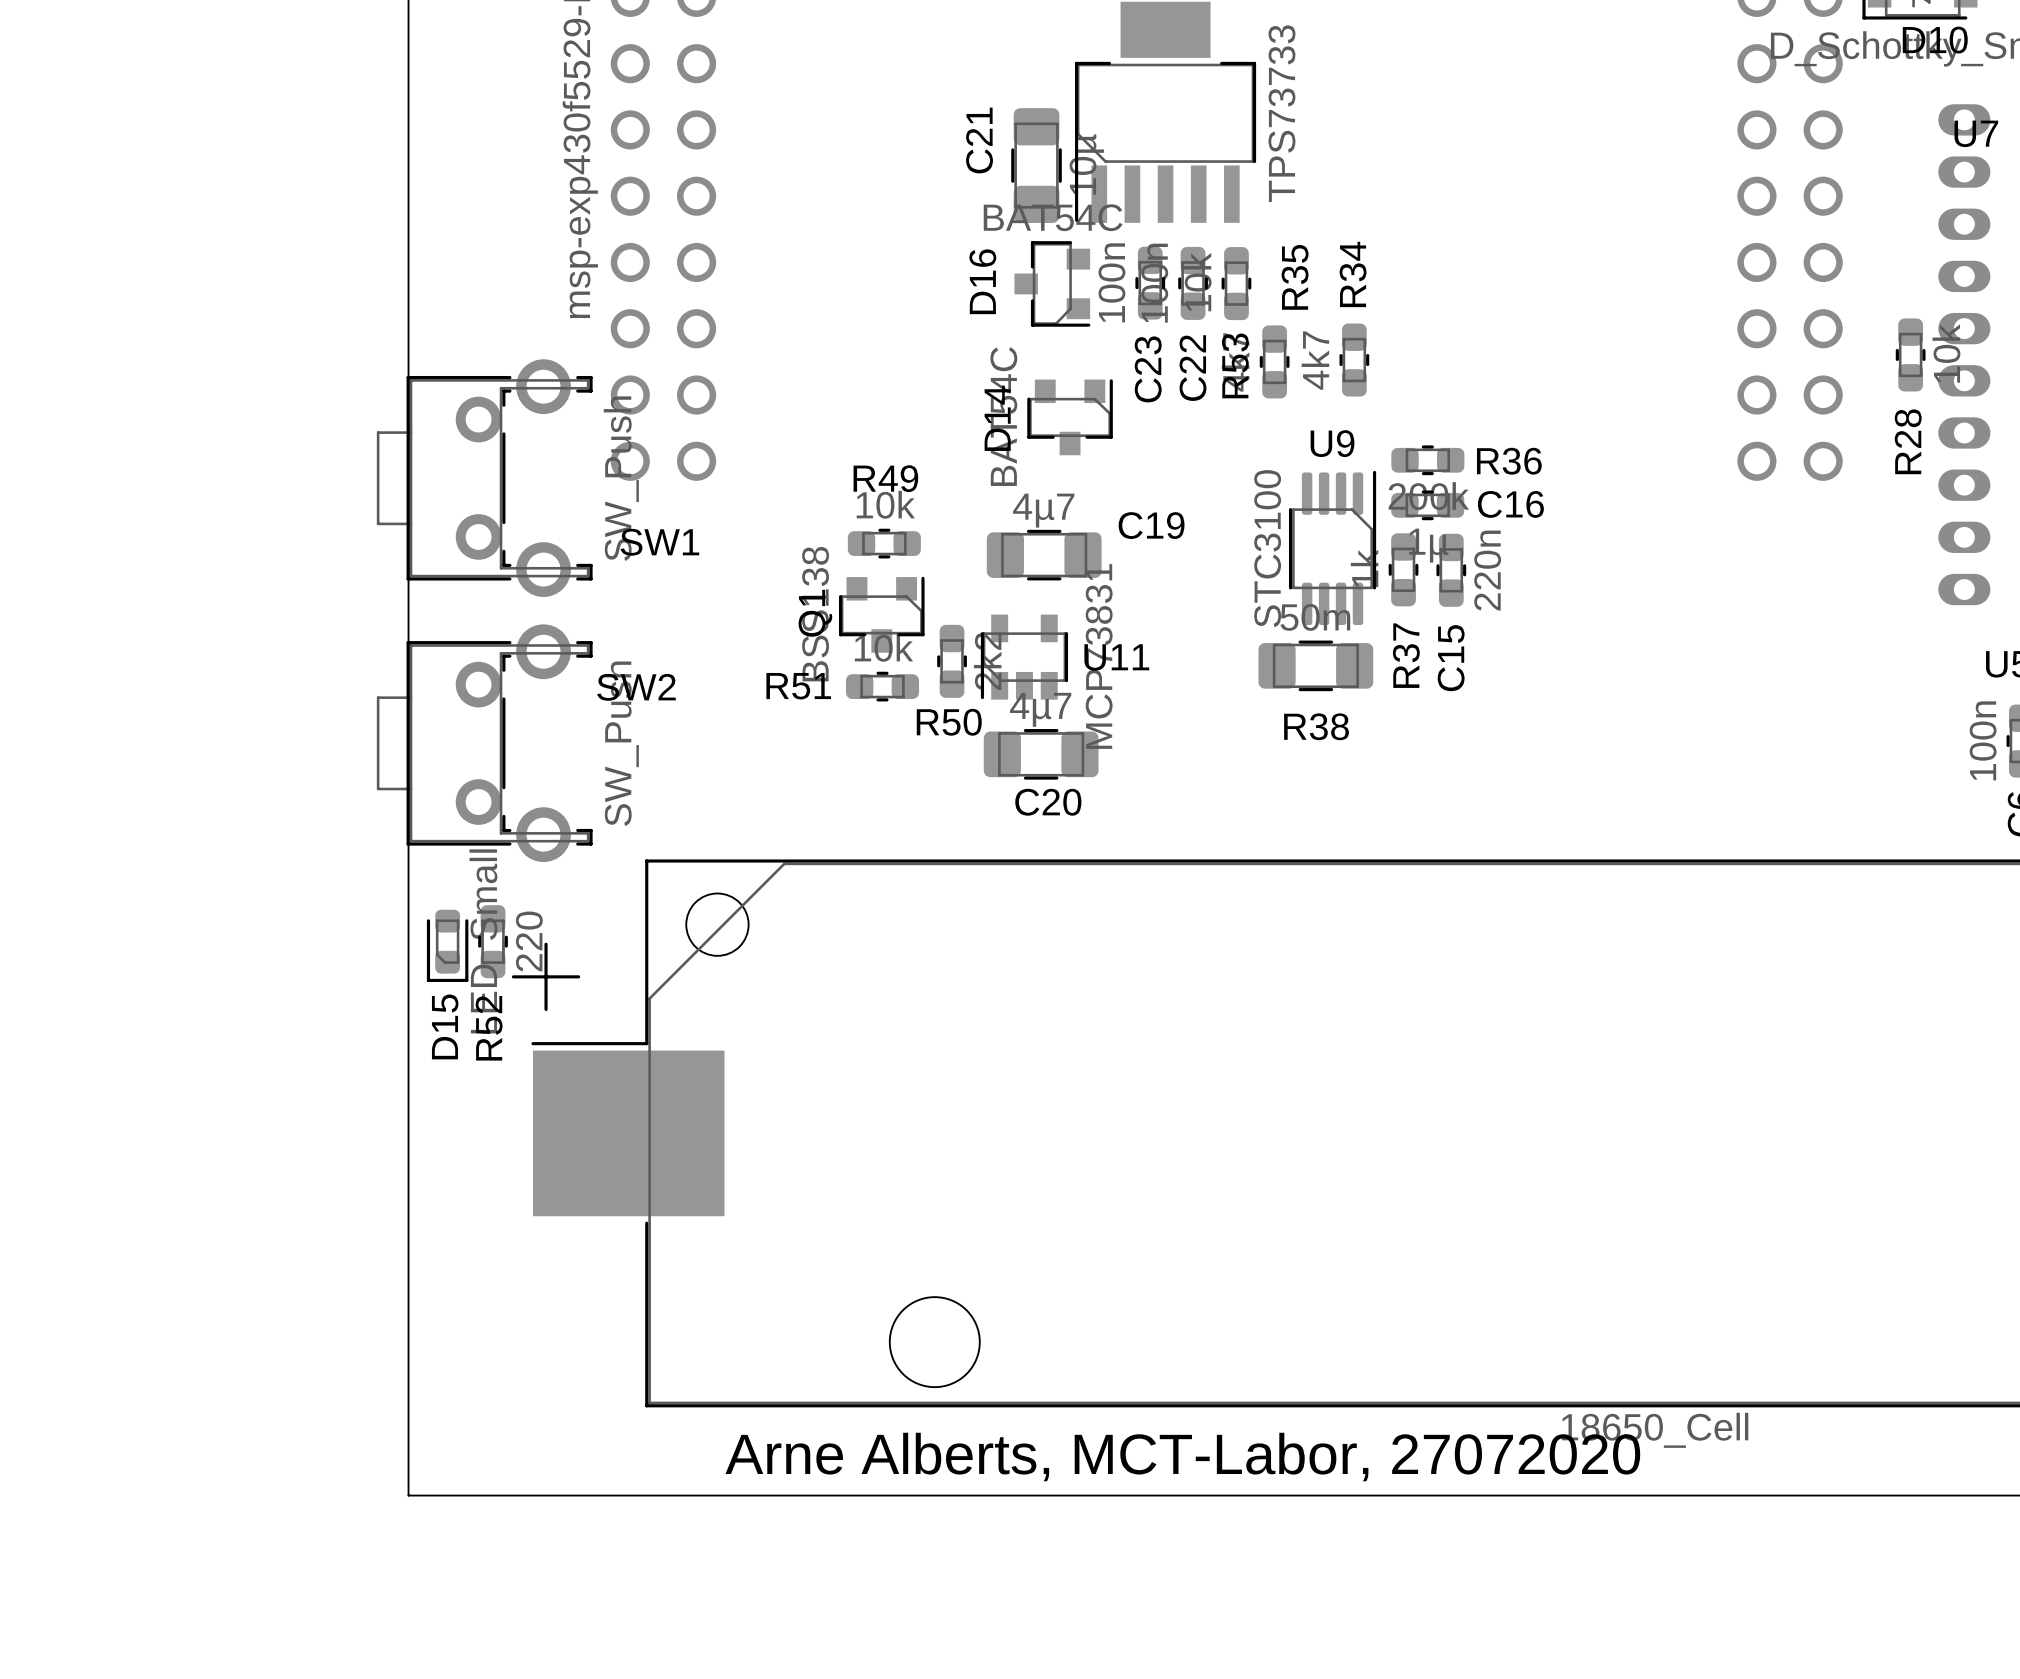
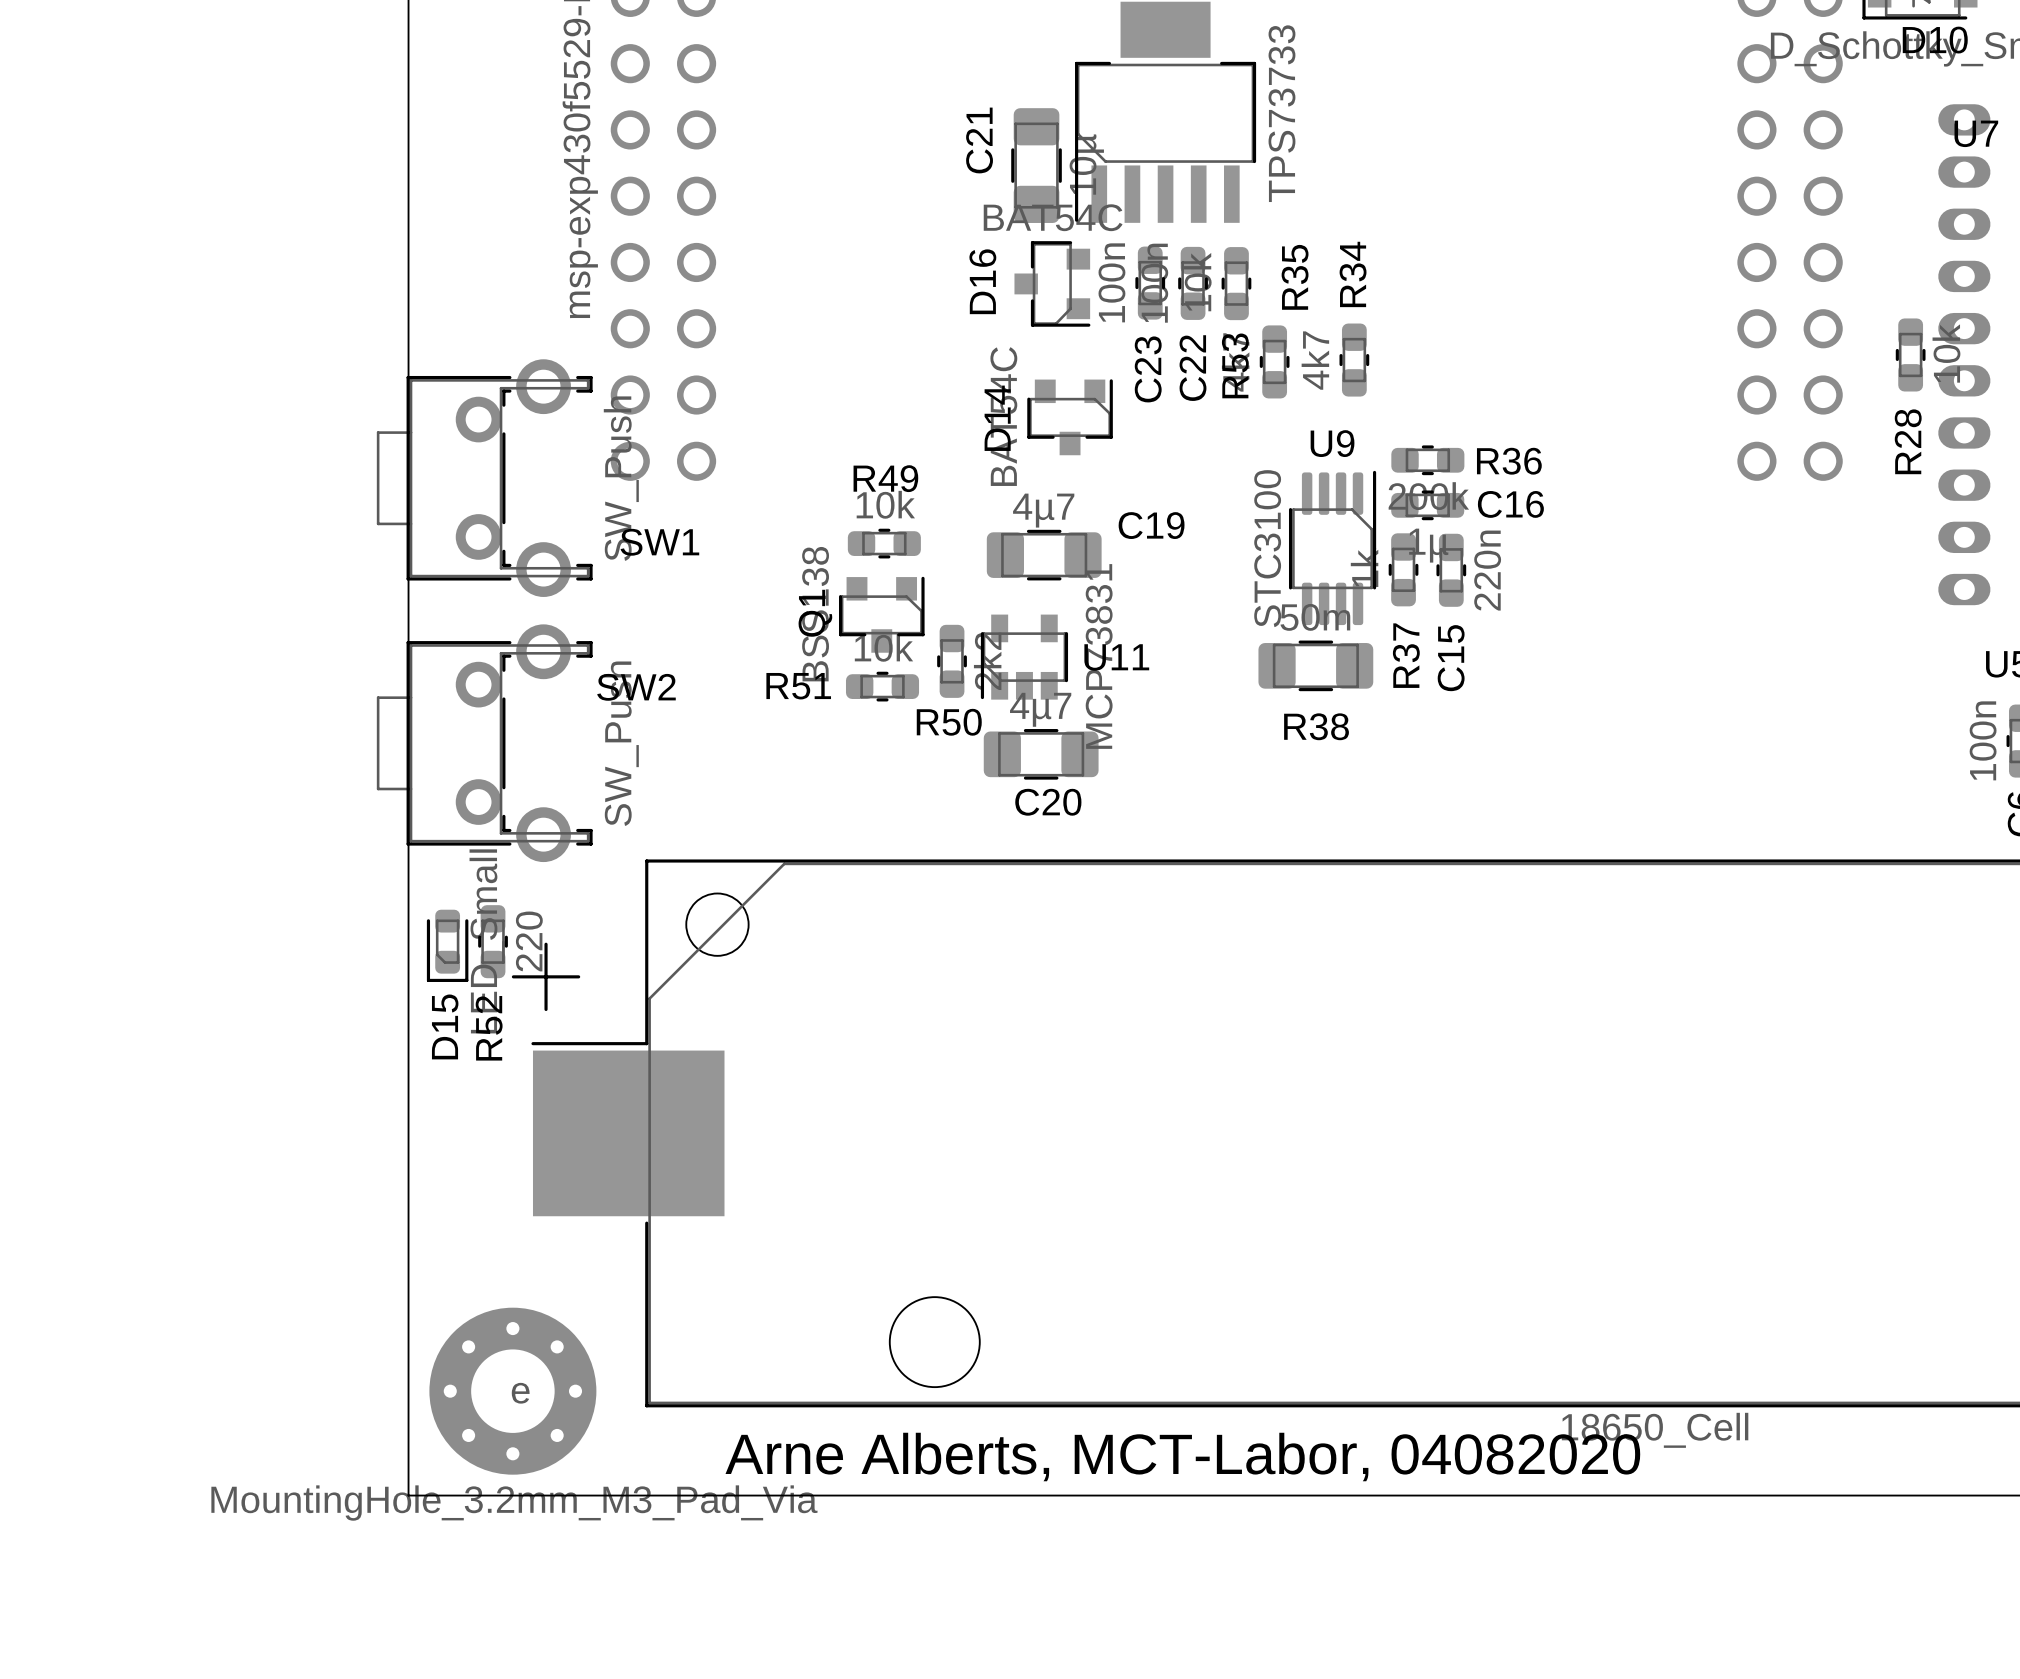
e: none -> MountingHole_3.2mm_M3_Pad_Via (512, 1391)
text: Arne Alberts, MCT-Labor, 27072020 (1182, 1457) -> Arne Alberts, MCT-Labor, 04082020 (1182, 1457)

